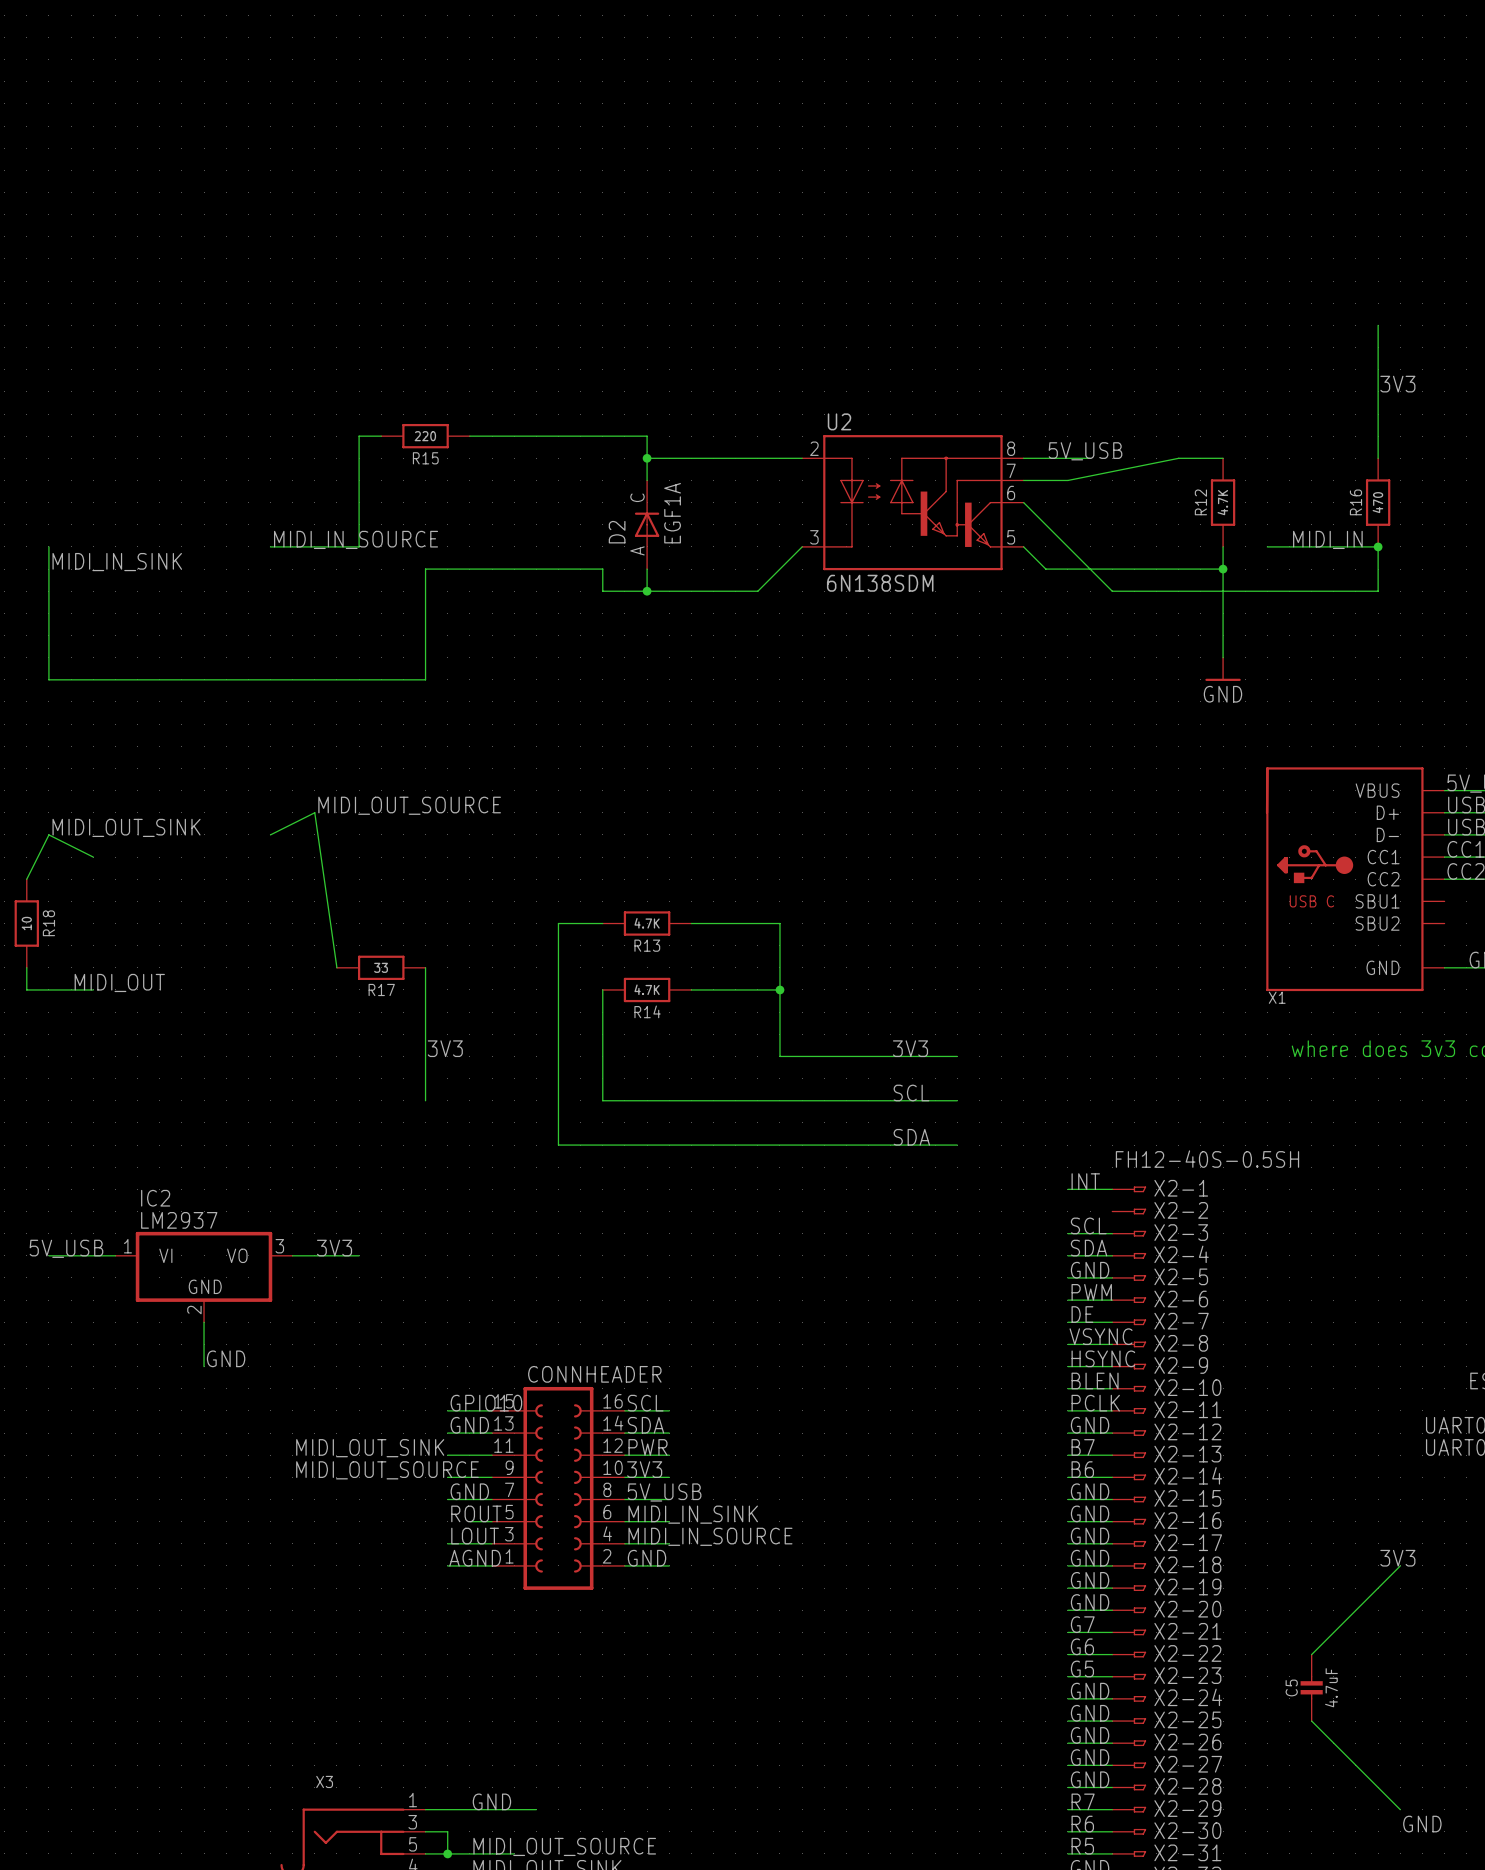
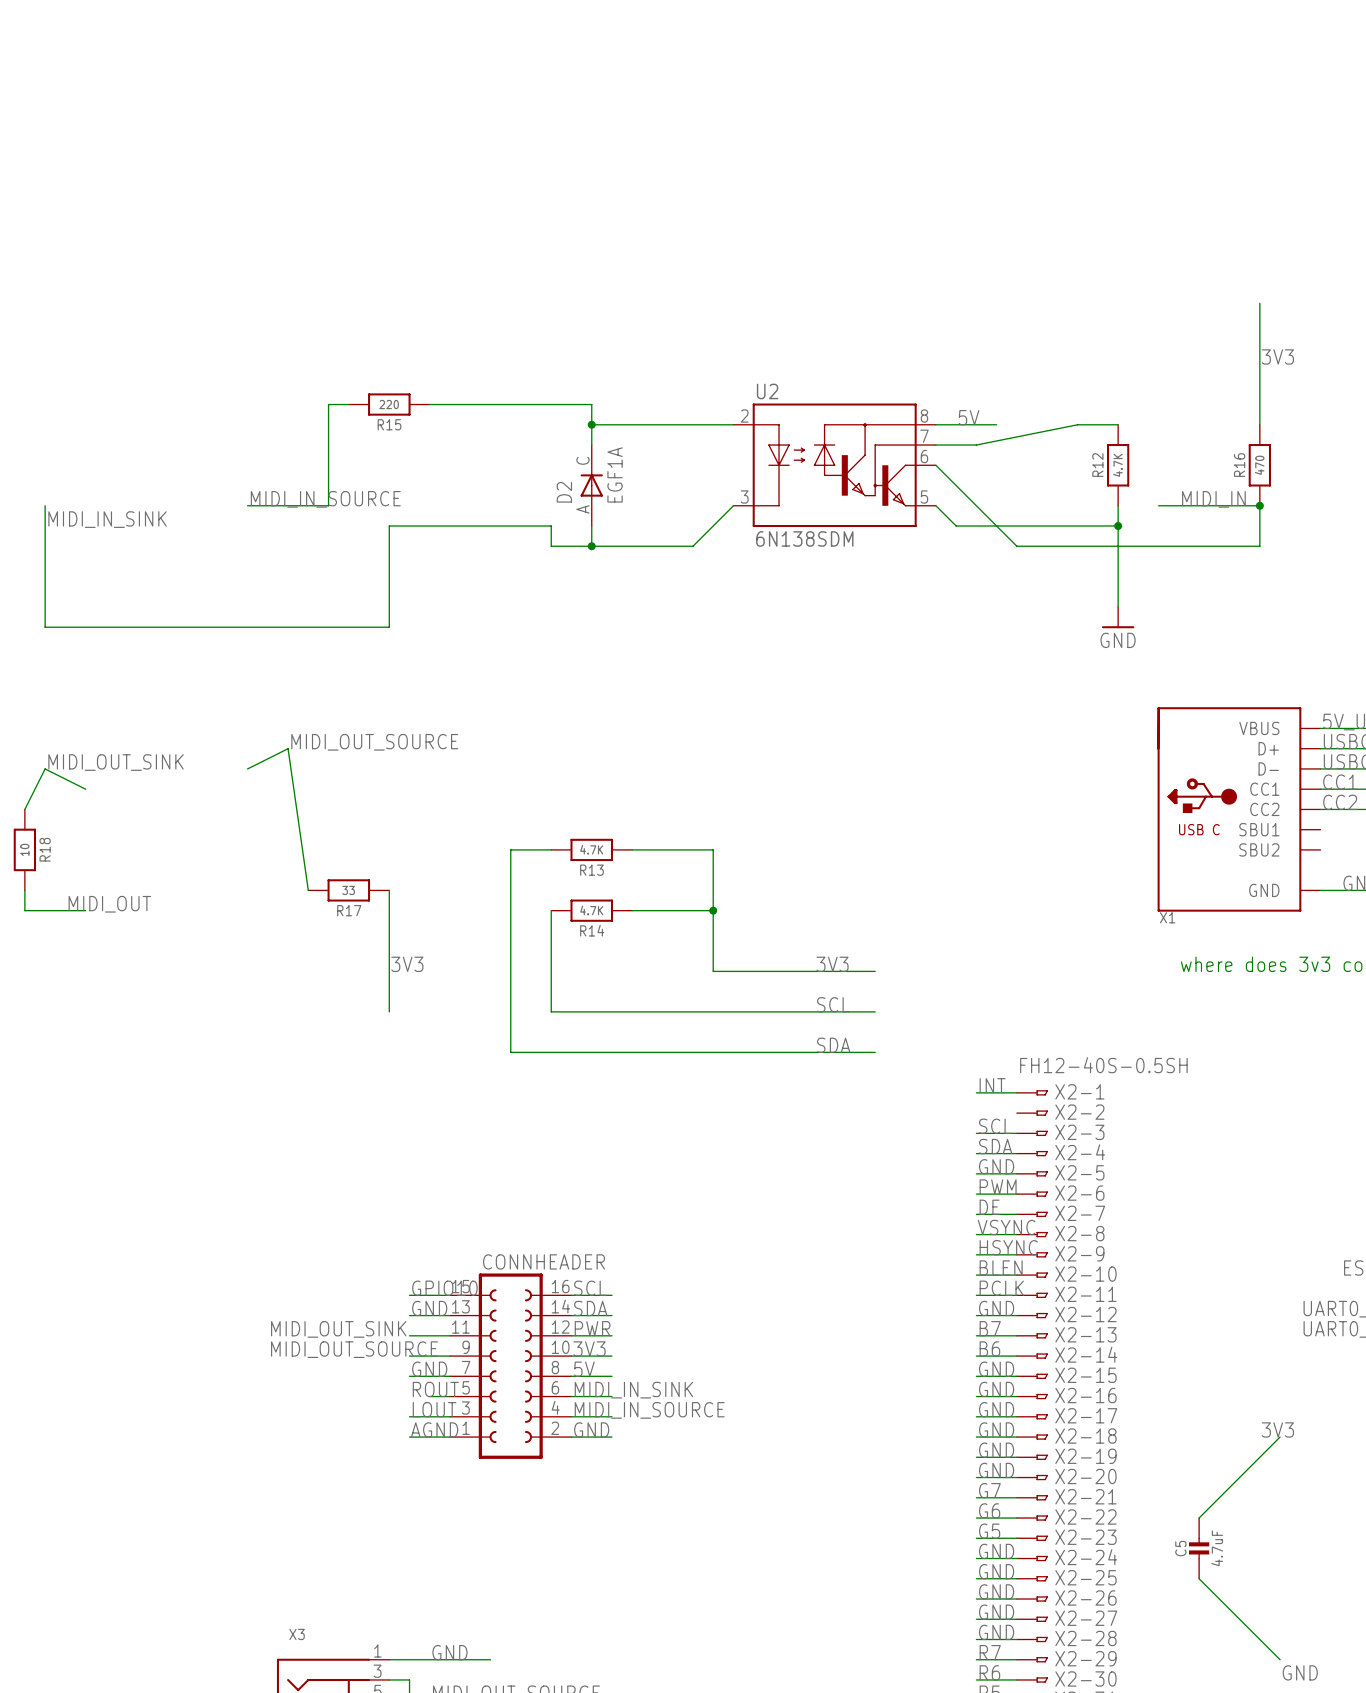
label: 5V_USB (1085, 451) -> 5V (969, 417)
label: 5V_USB (66, 1248) -> none
label: 3V3 (334, 1248) -> none
wire: (48, 1255) (115, 1255) -> none
wire: (292, 1255) (359, 1255) -> none
IC2: LM2937 (204, 1277) -> none
wire: (204, 1322) (204, 1366) -> none
label: GND (226, 1358) -> none
label: 5V_USB (664, 1492) -> 5V (584, 1369)

